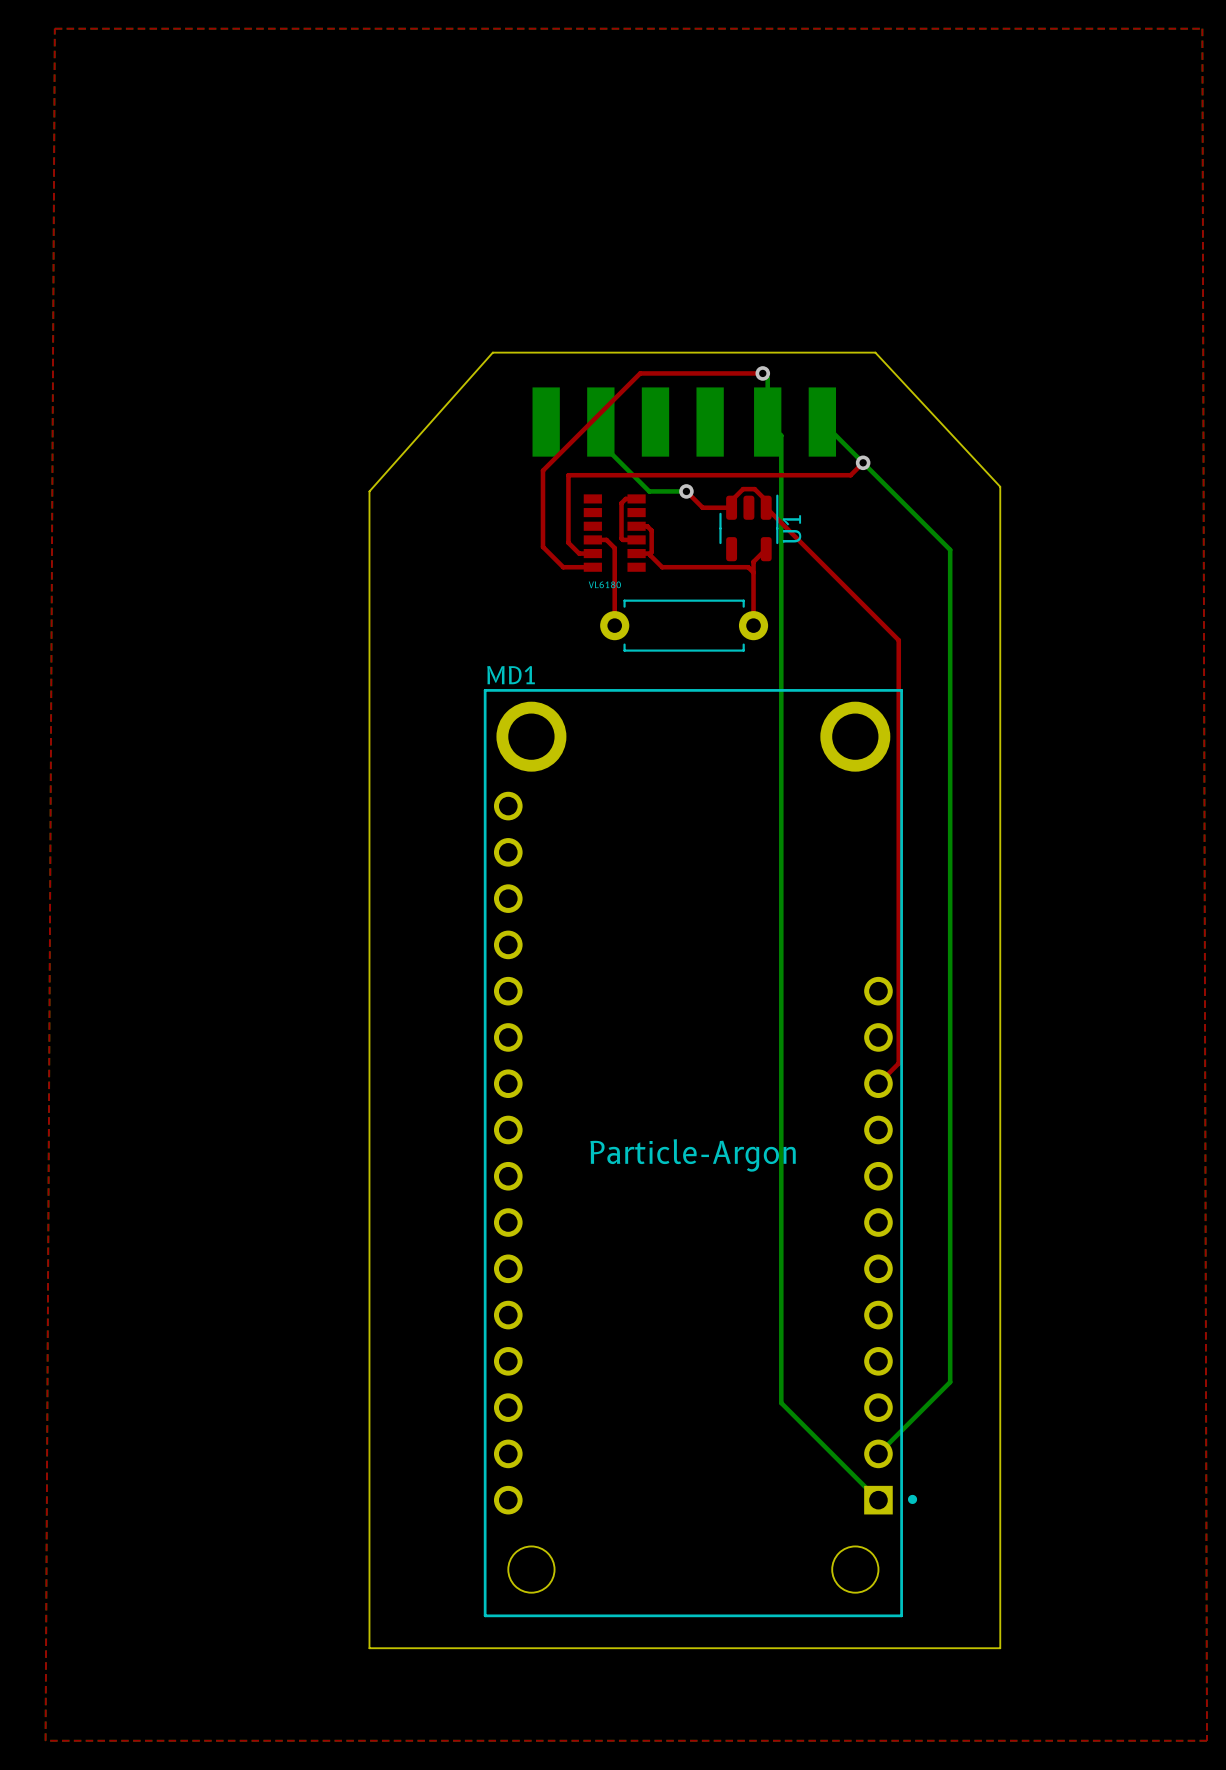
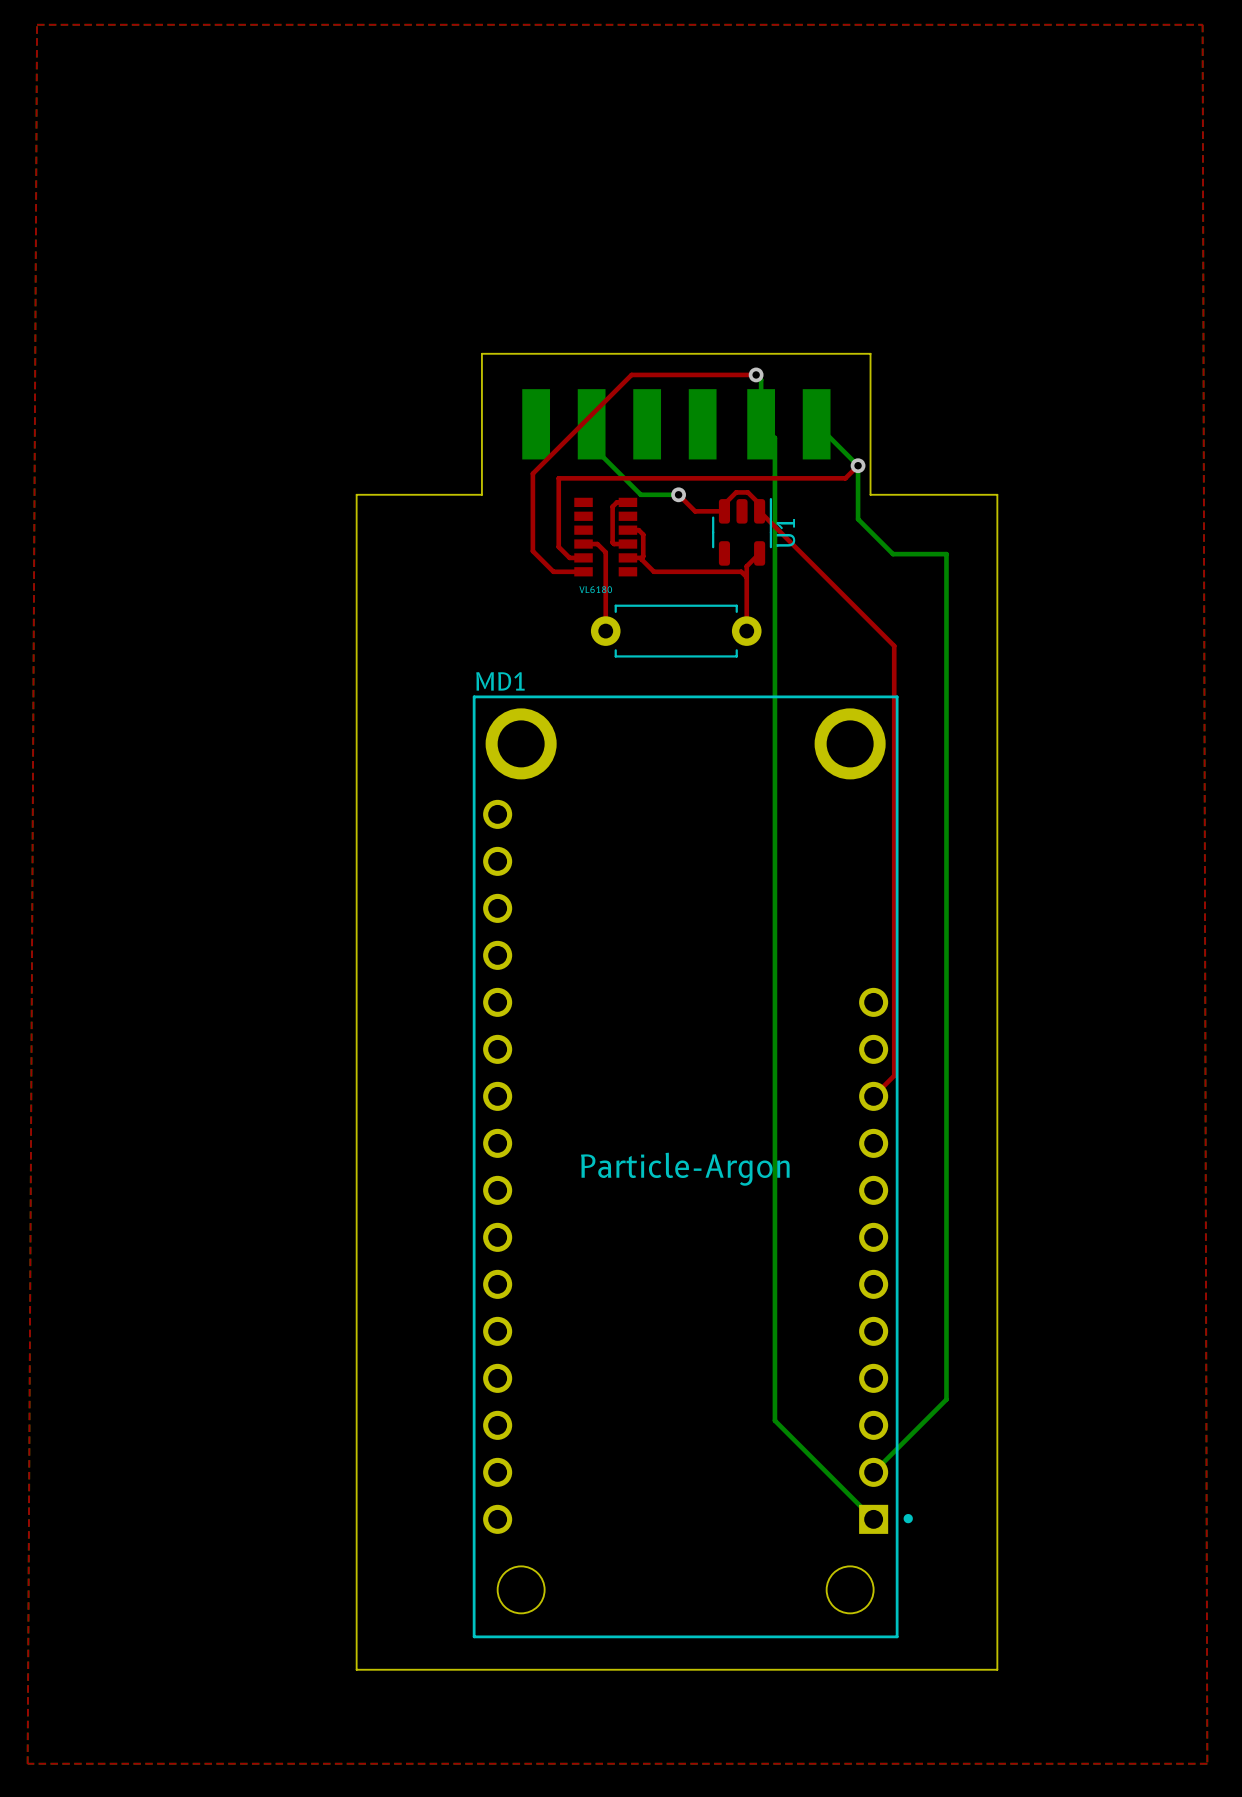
board edge: (492, 352) (369, 491) -> (481, 353) (481, 494) (356, 494)
board edge: (875, 352) (1000, 486) (1000, 491) -> (870, 353) (870, 494) (997, 494)
bottom track: (863, 462) (950, 549) -> (858, 465) (858, 519) (893, 554) (946, 554)

